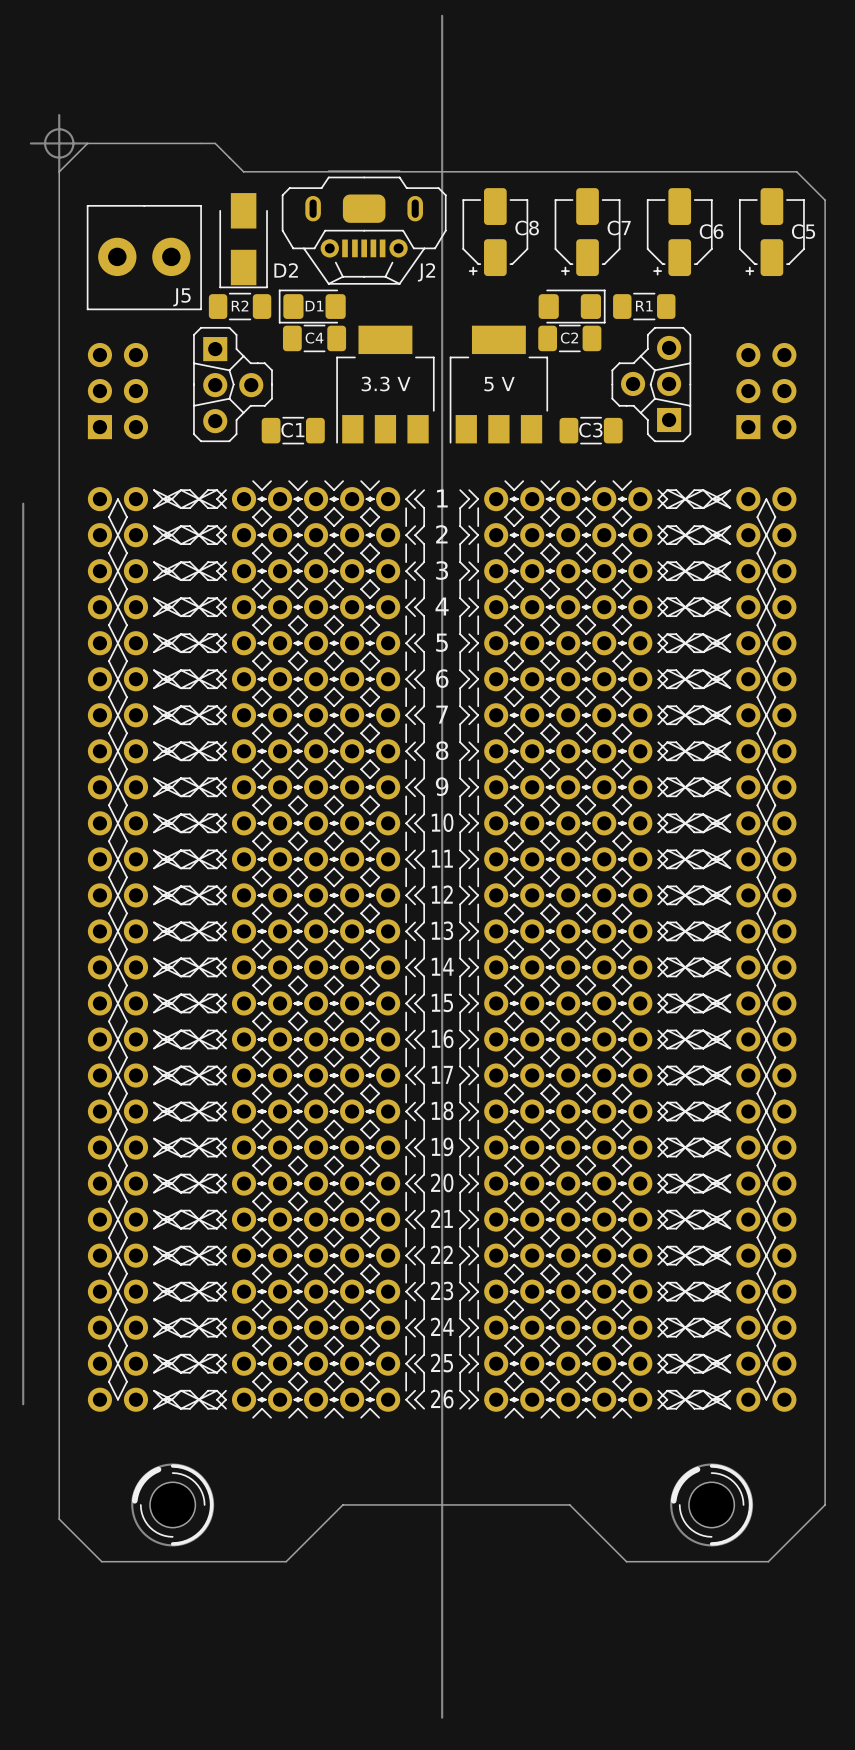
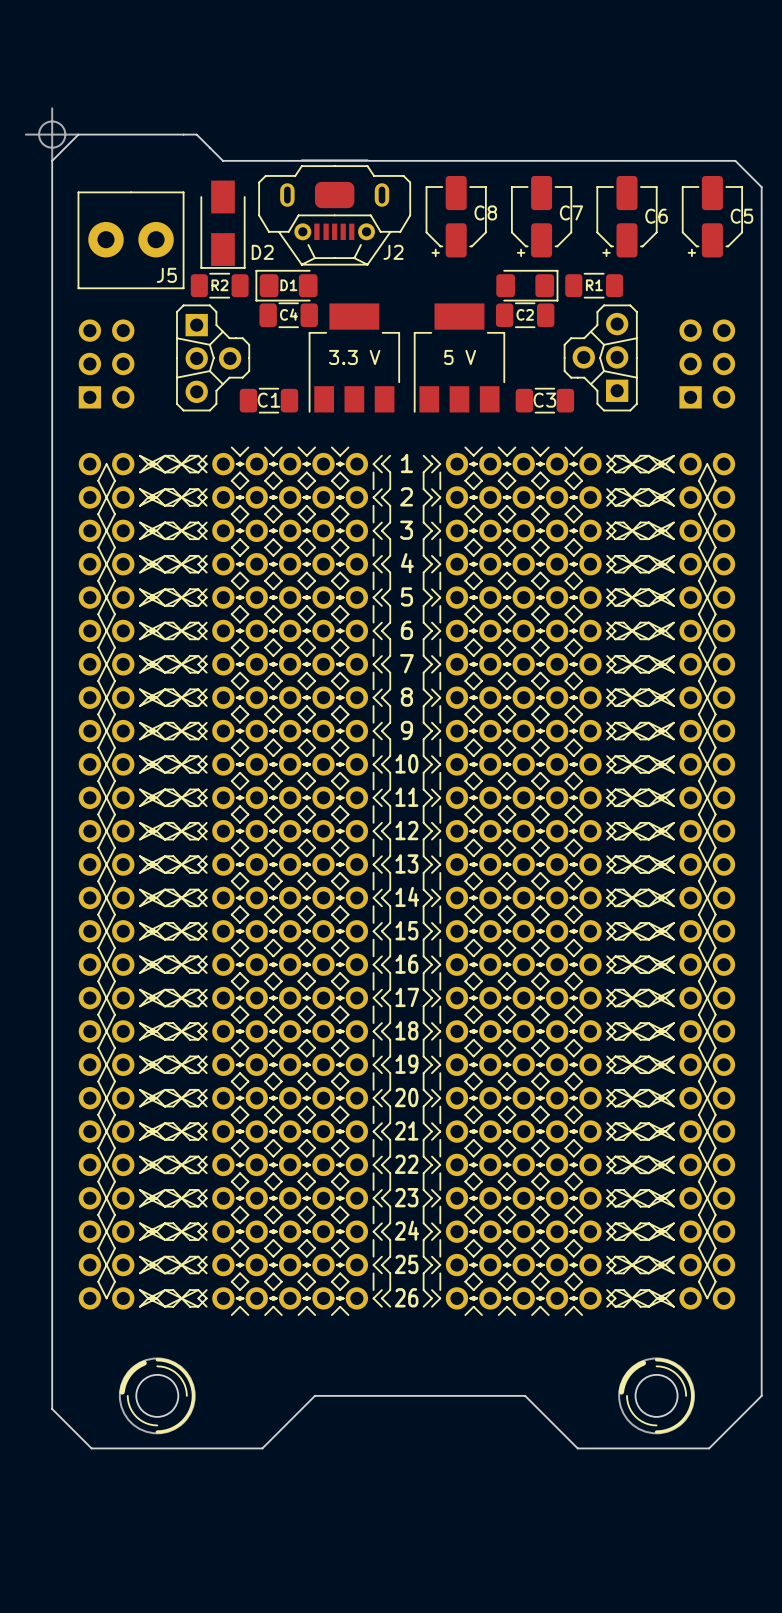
line: (442, 15) (442, 1717) -> none
line: (23, 503) (23, 1404) -> none

